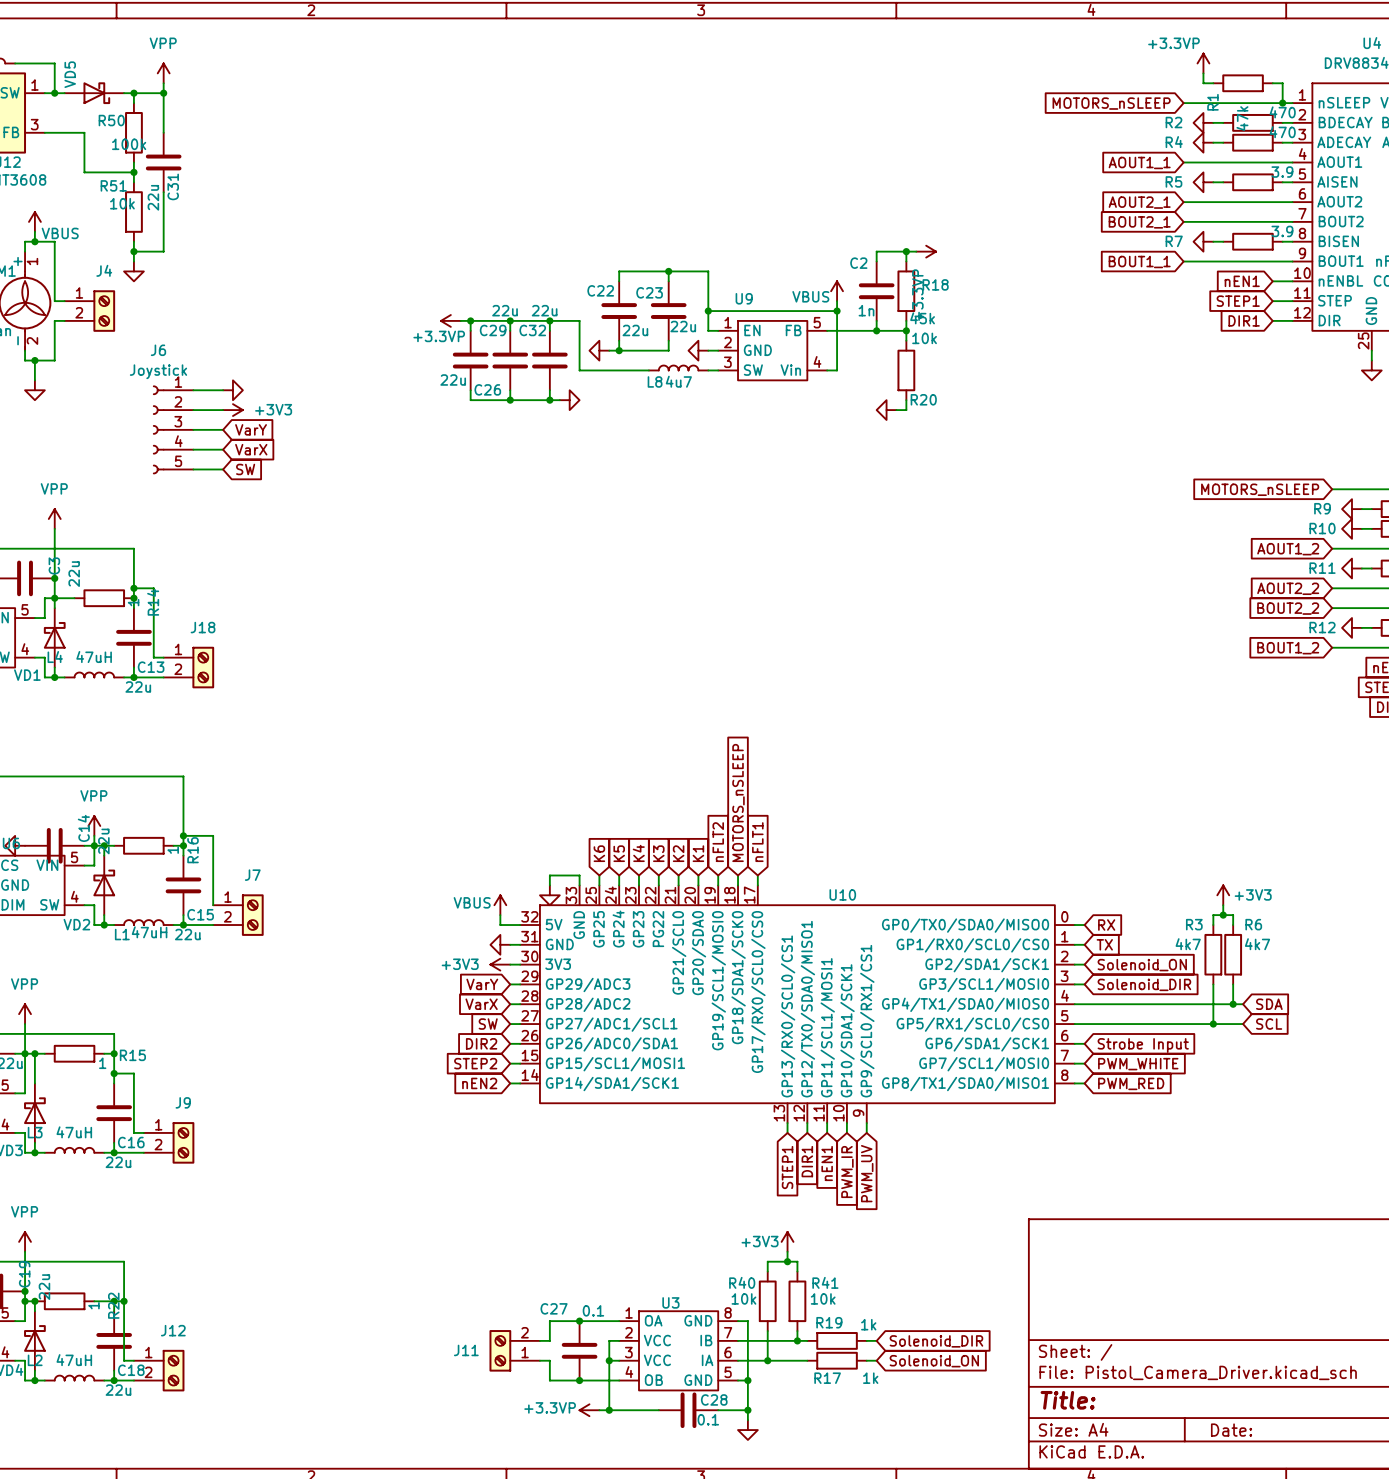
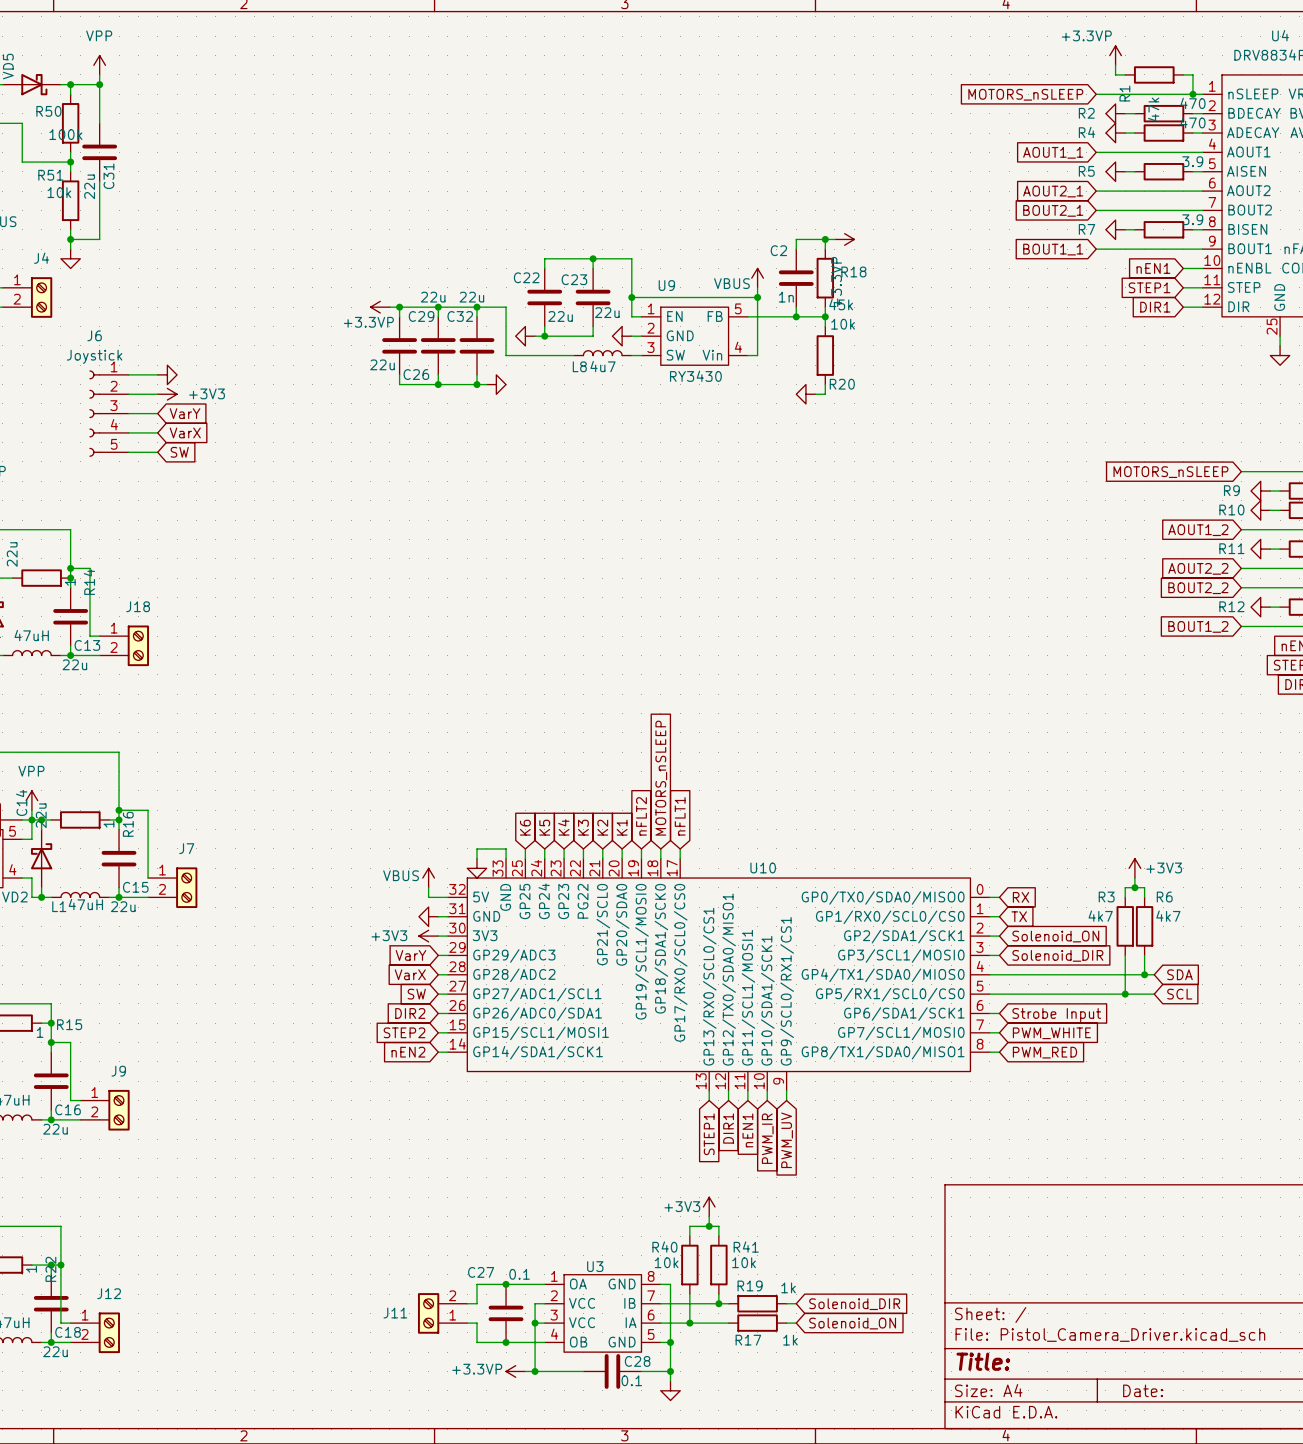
U9 value: none -> RY3430 (695, 376)

